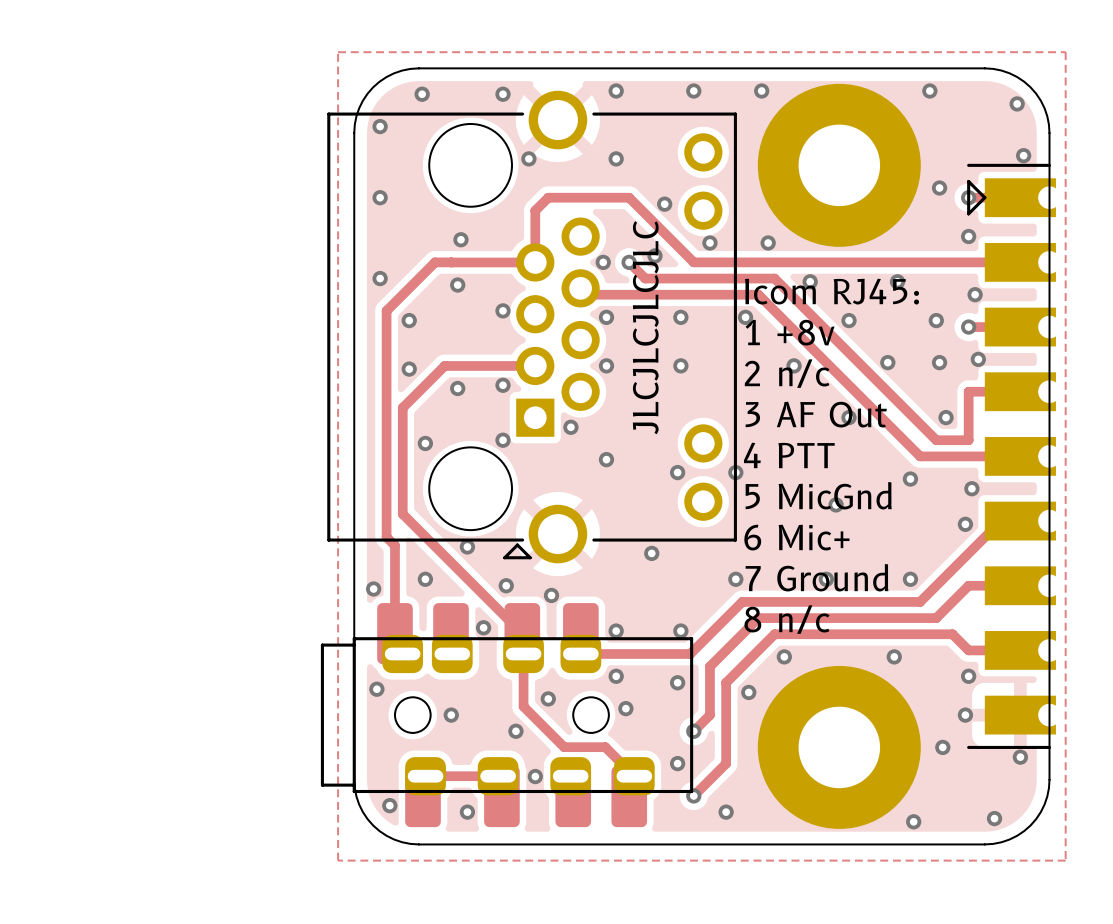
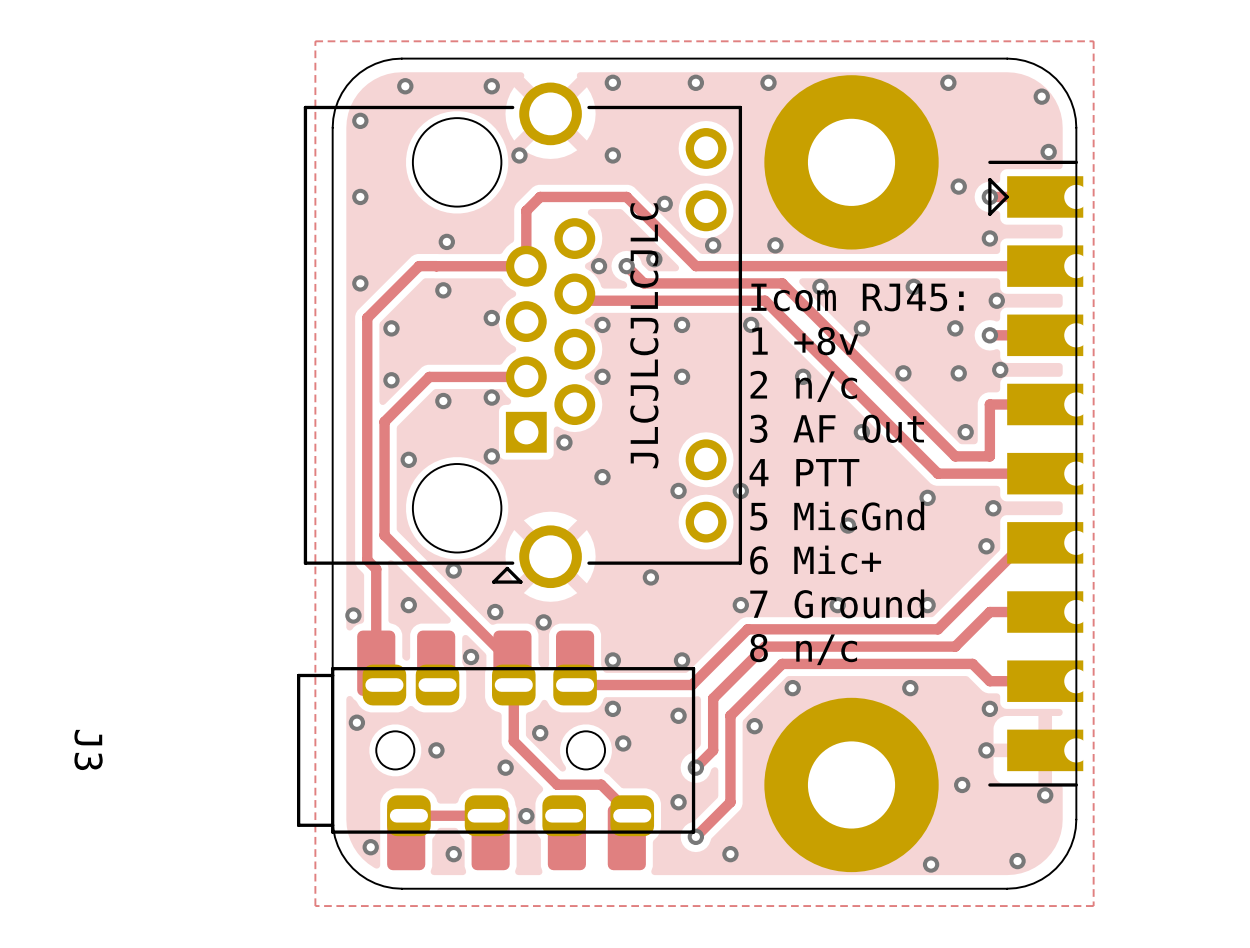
J3 name: none -> J3 (88, 749)

